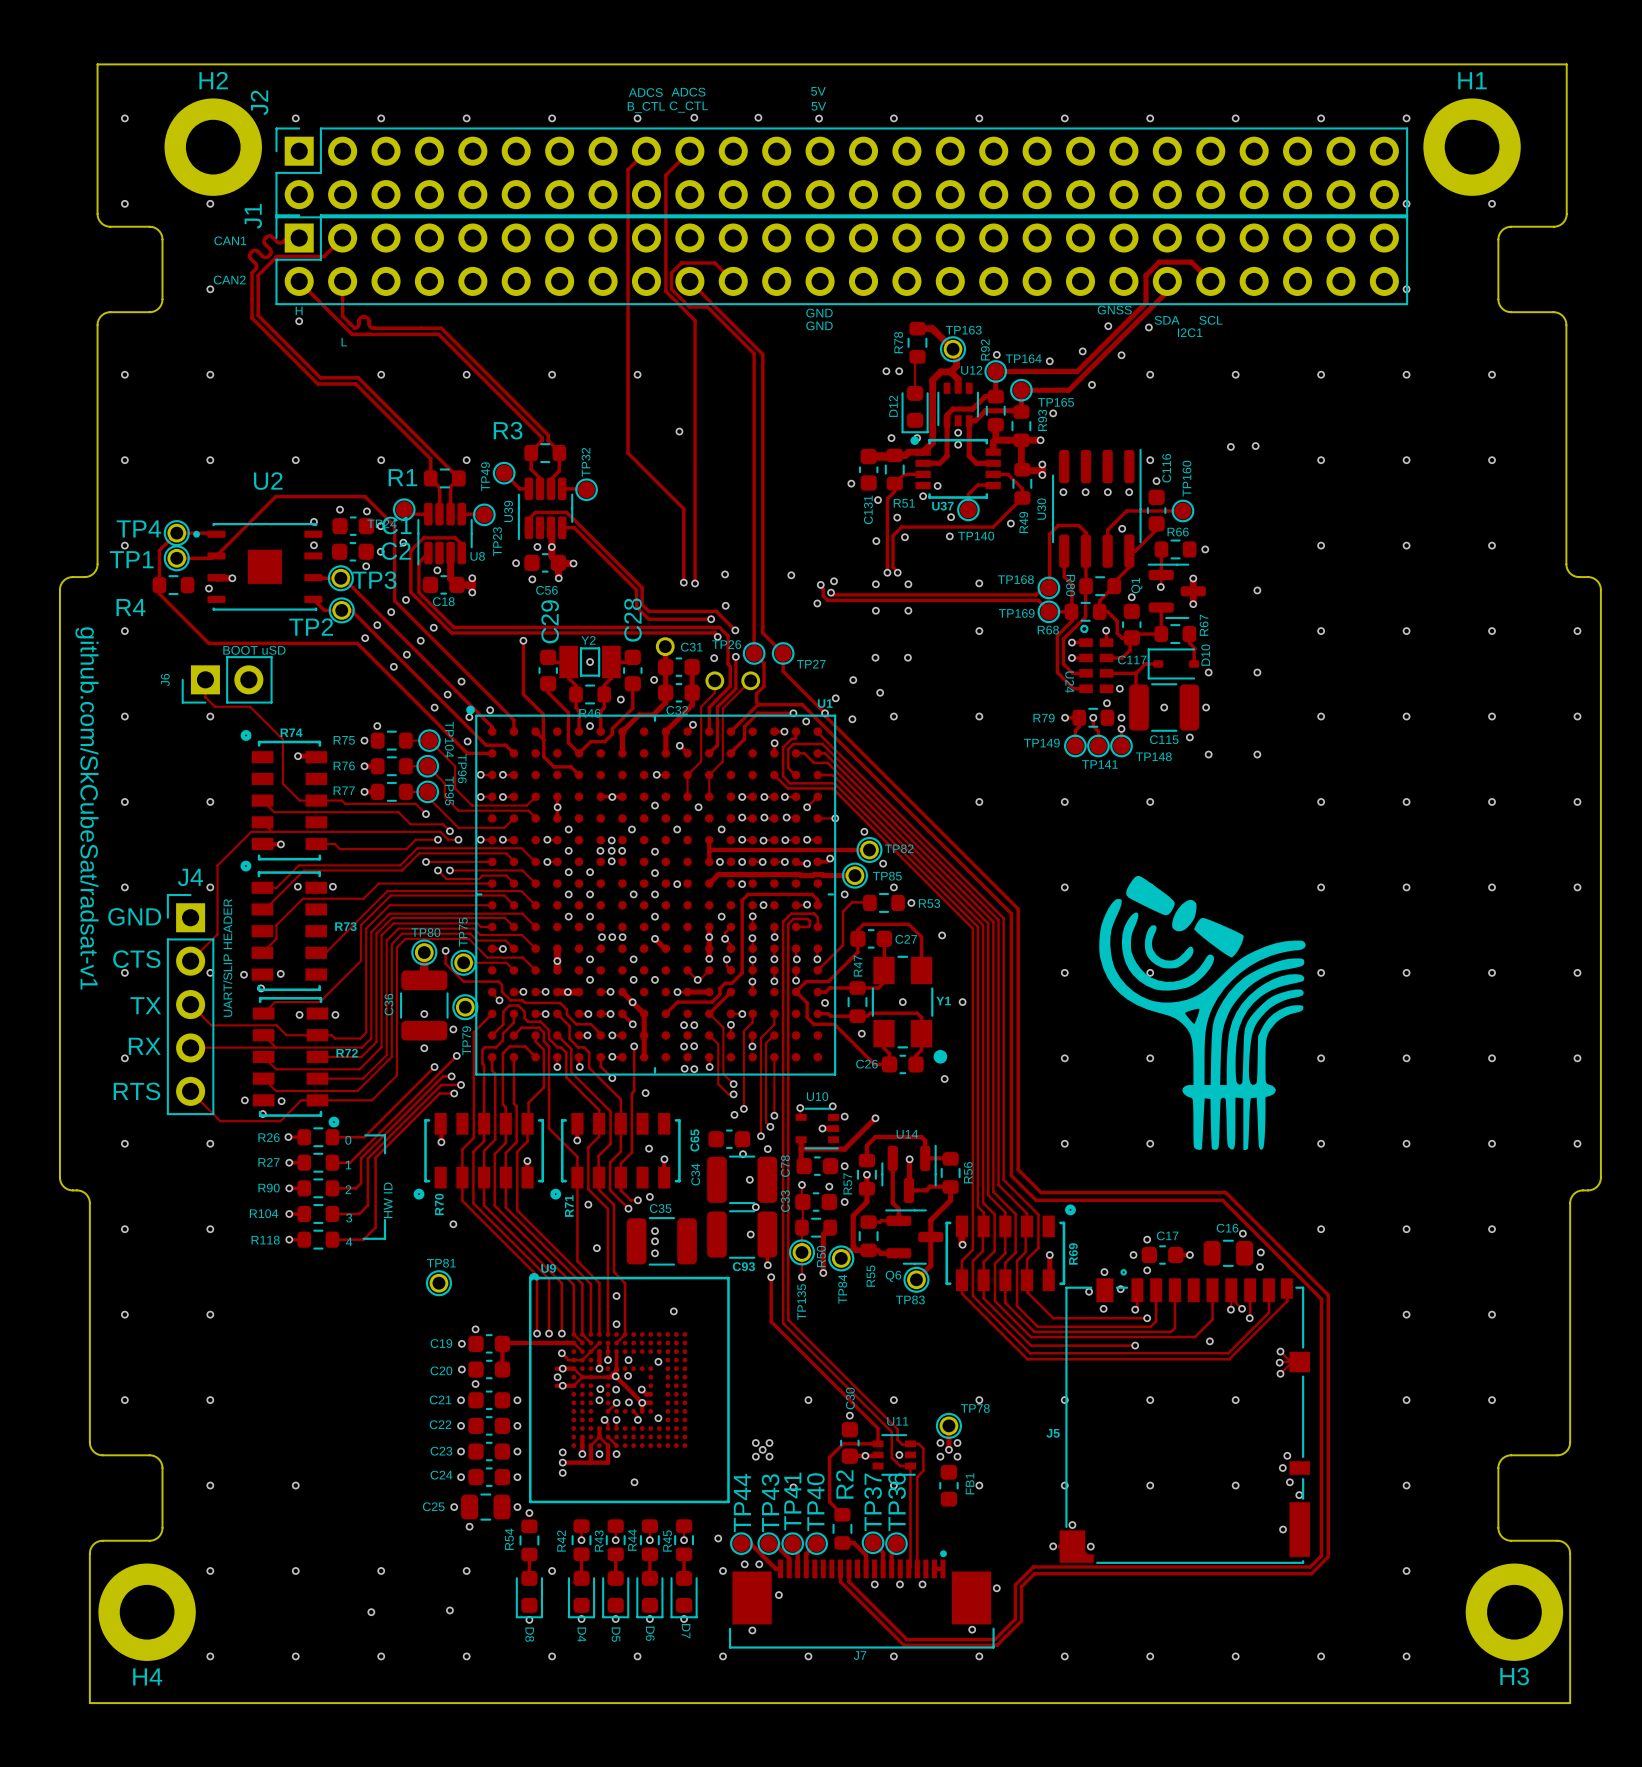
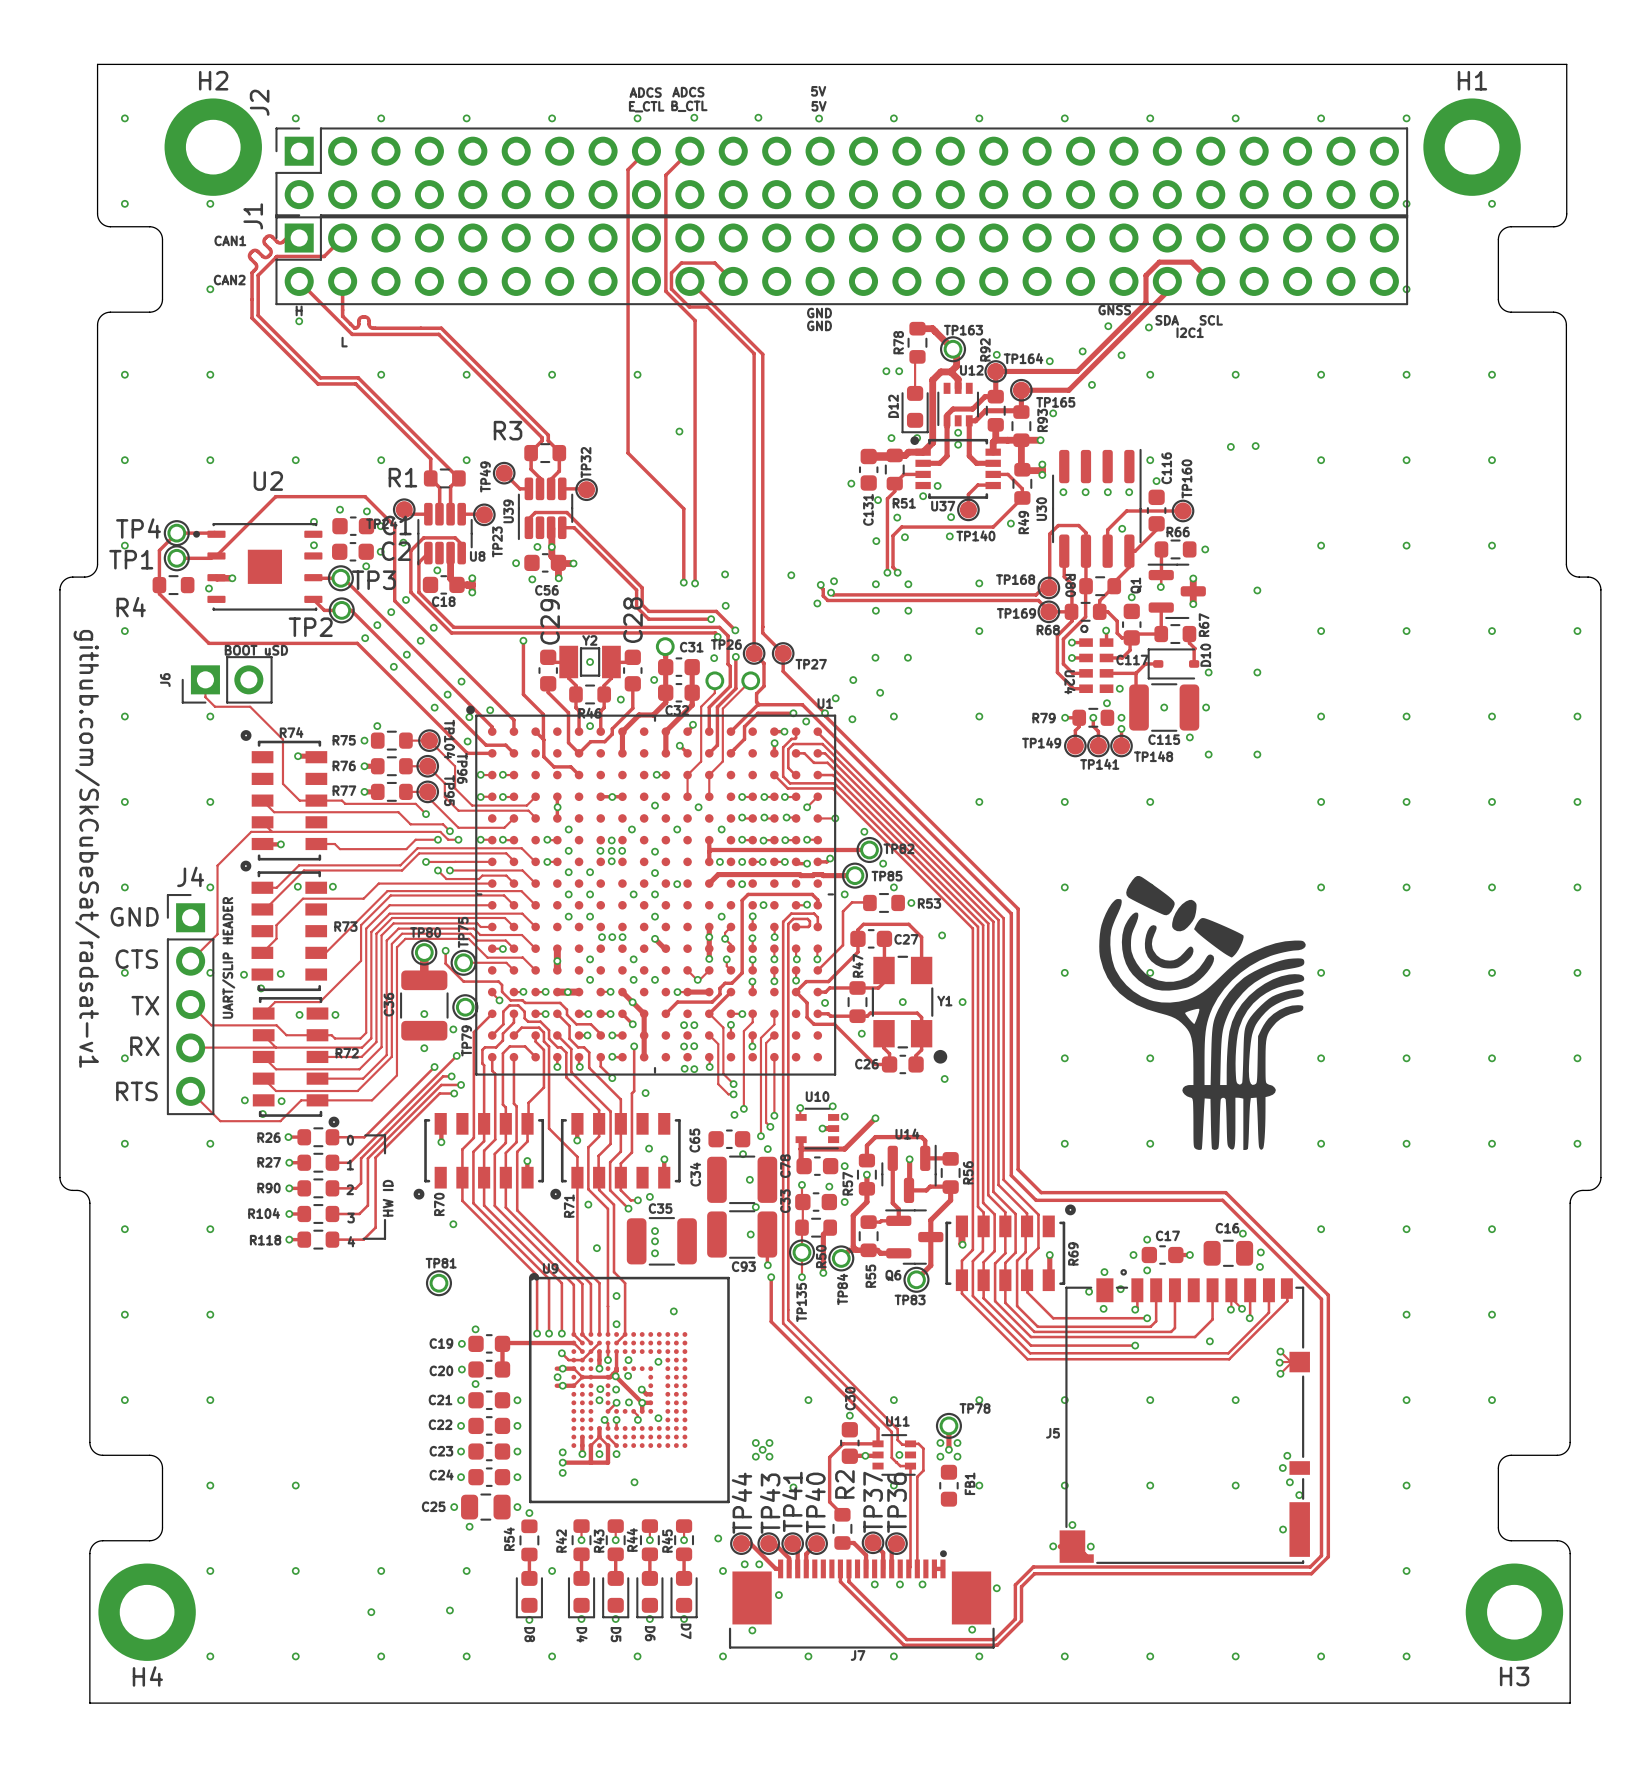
text: B_CTL (646, 107) -> E_CTL (646, 106)
text: C_CTL (688, 107) -> B_CTL (689, 106)

